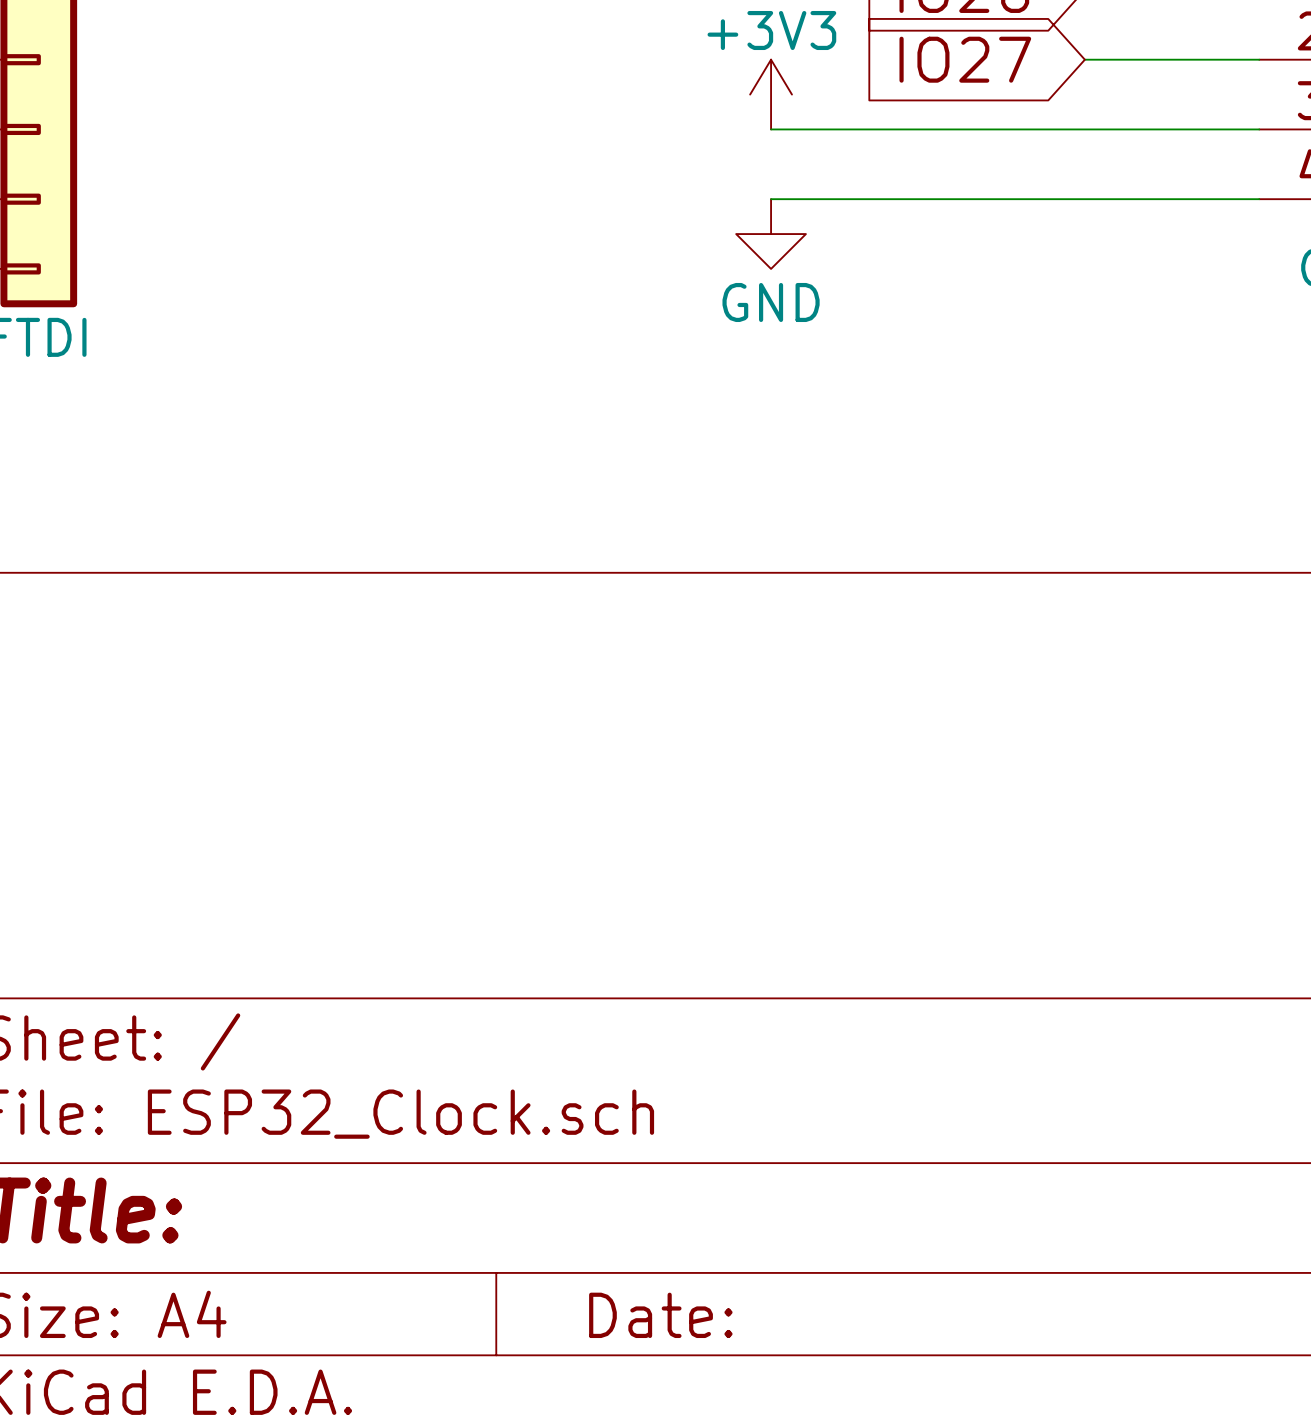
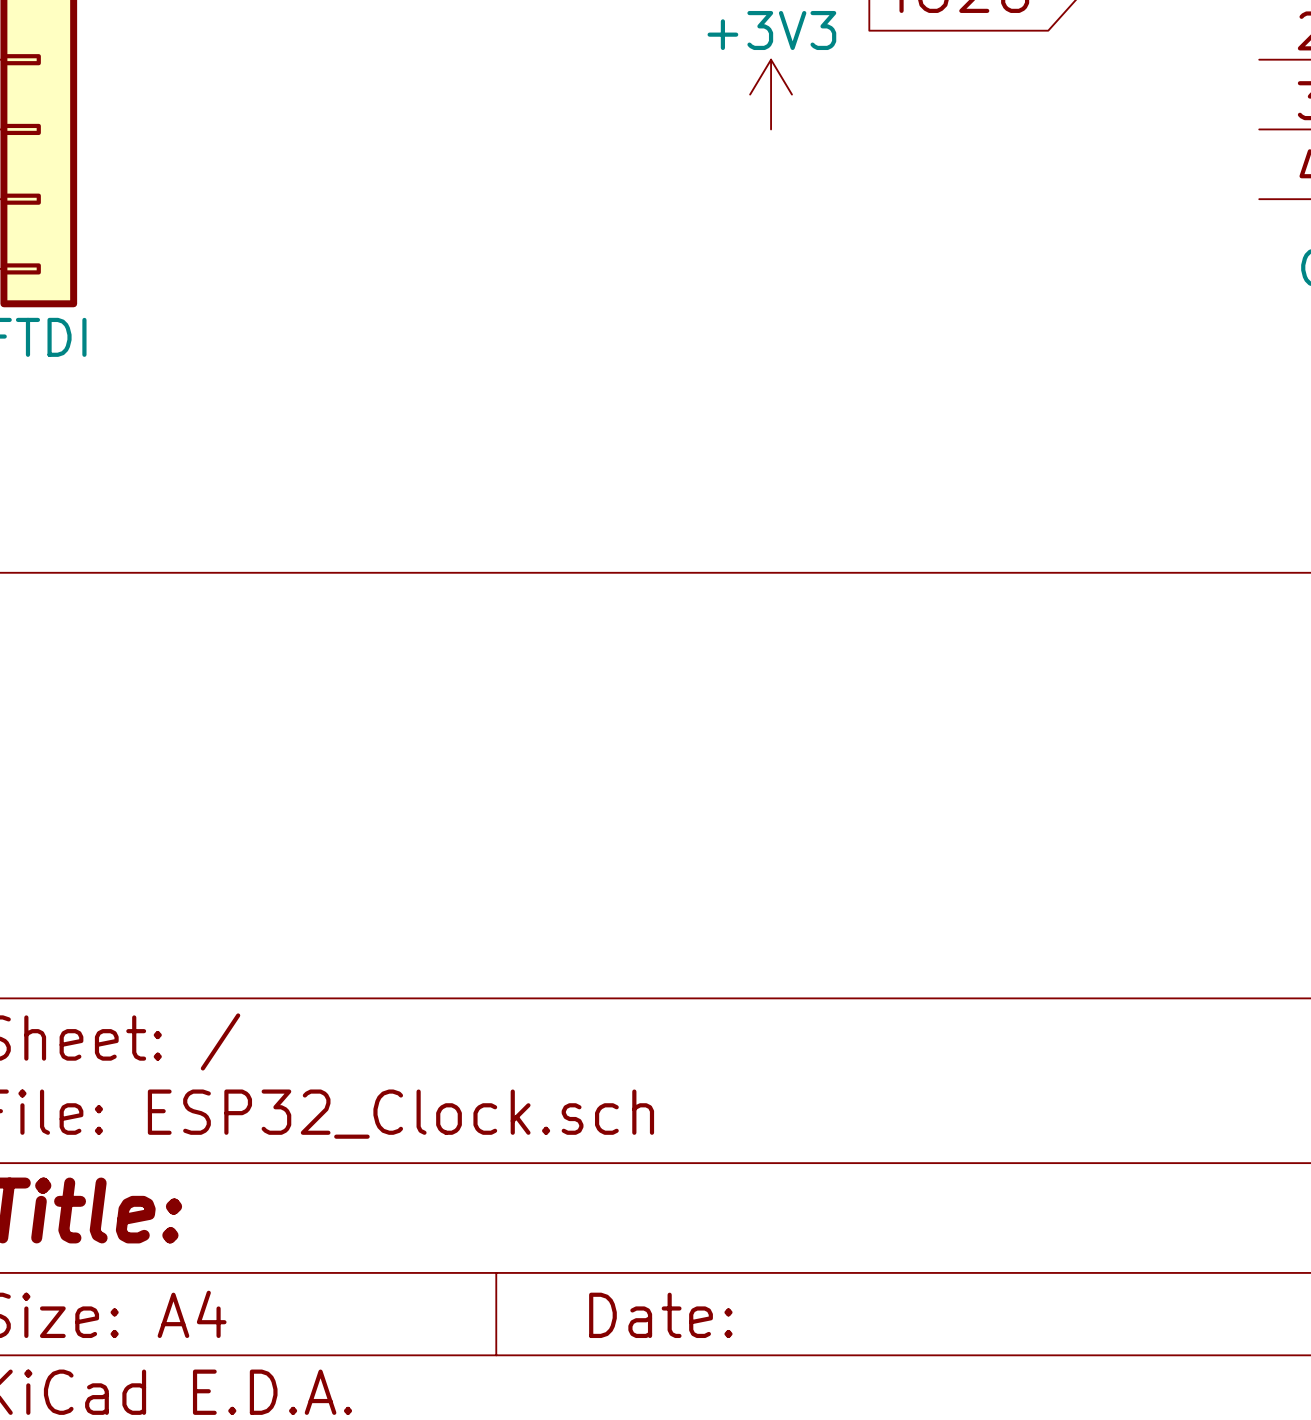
global label: IO27 (965, 59) -> none
wire: (1084, 59) (1259, 59) -> none
wire: (771, 129) (1259, 129) -> none
wire: (771, 199) (1259, 199) -> none
power symbol: GND (771, 234) -> none

